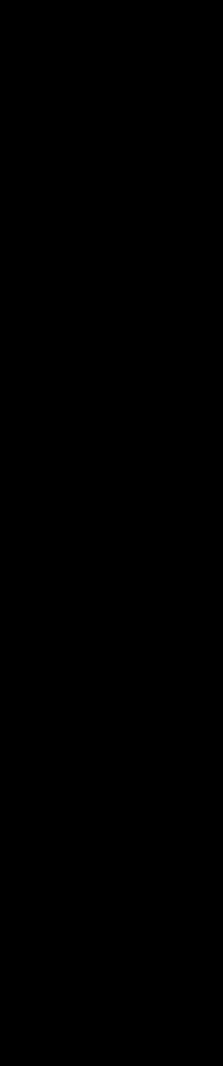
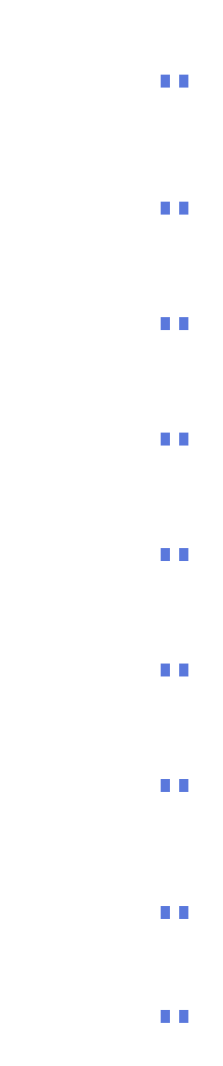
part: none -> (174, 81)
part: none -> (174, 208)
part: none -> (174, 323)
part: none -> (174, 439)
part: none -> (174, 554)
part: none -> (174, 670)
part: none -> (174, 785)
part: none -> (174, 912)
part: none -> (174, 1016)

